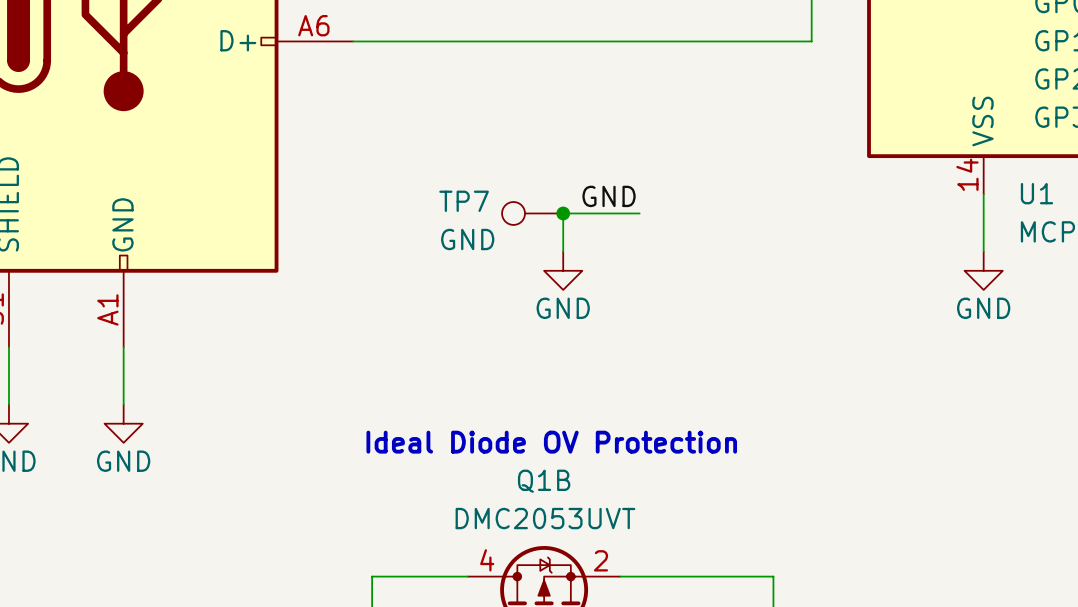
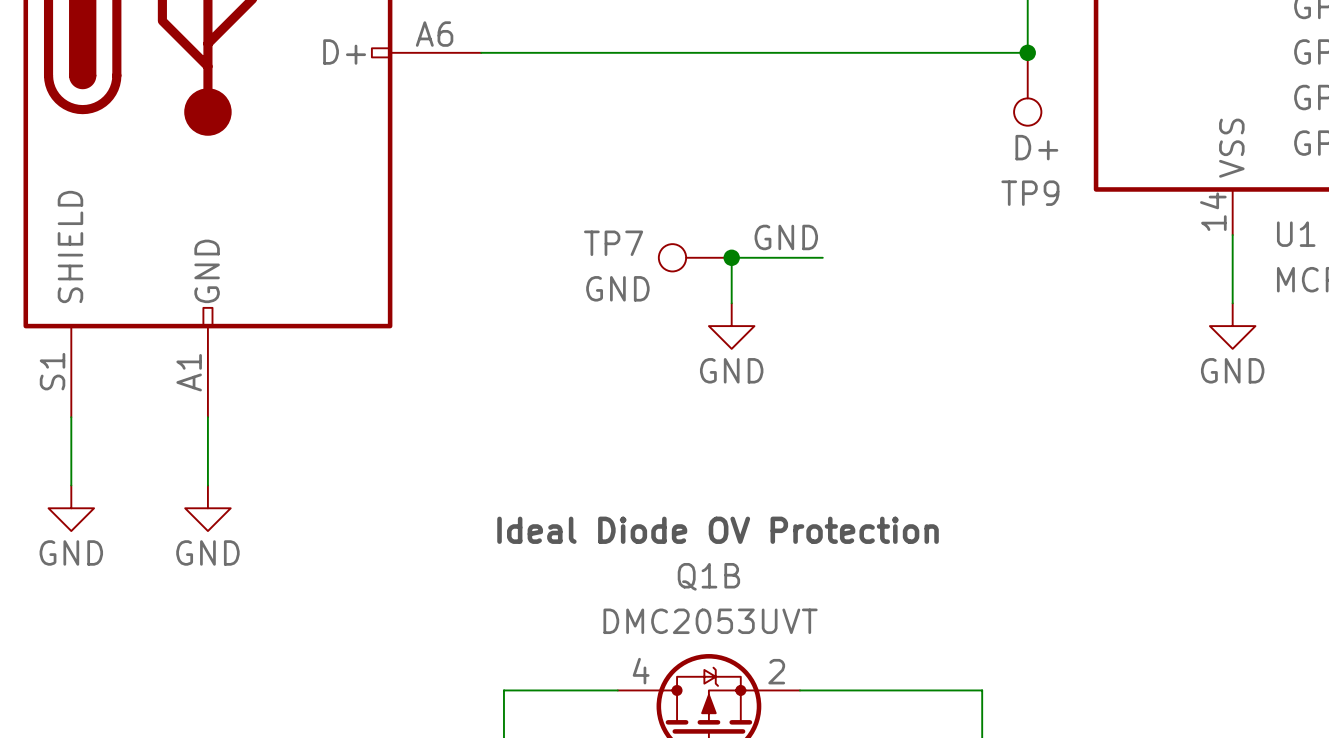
junction: none -> (1027, 52)
TP9: none -> D+ (1027, 89)

